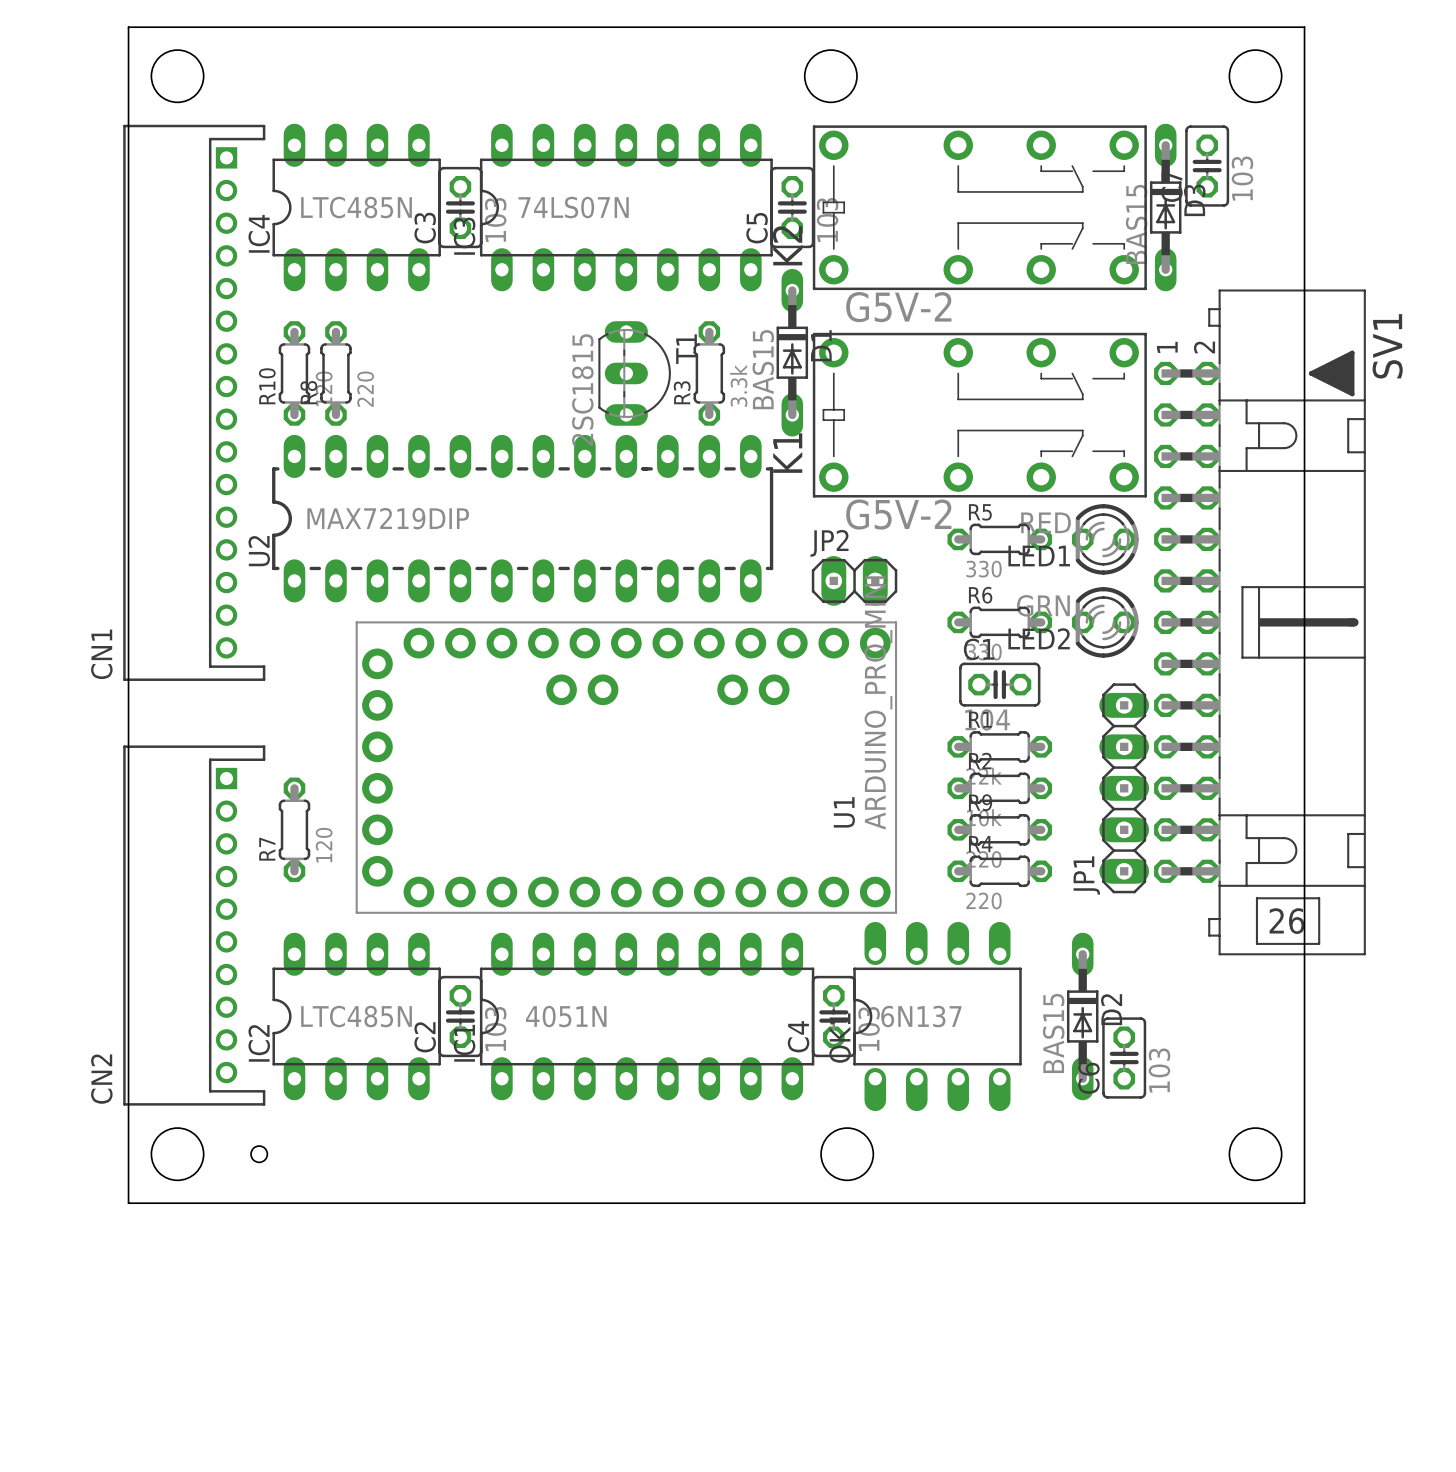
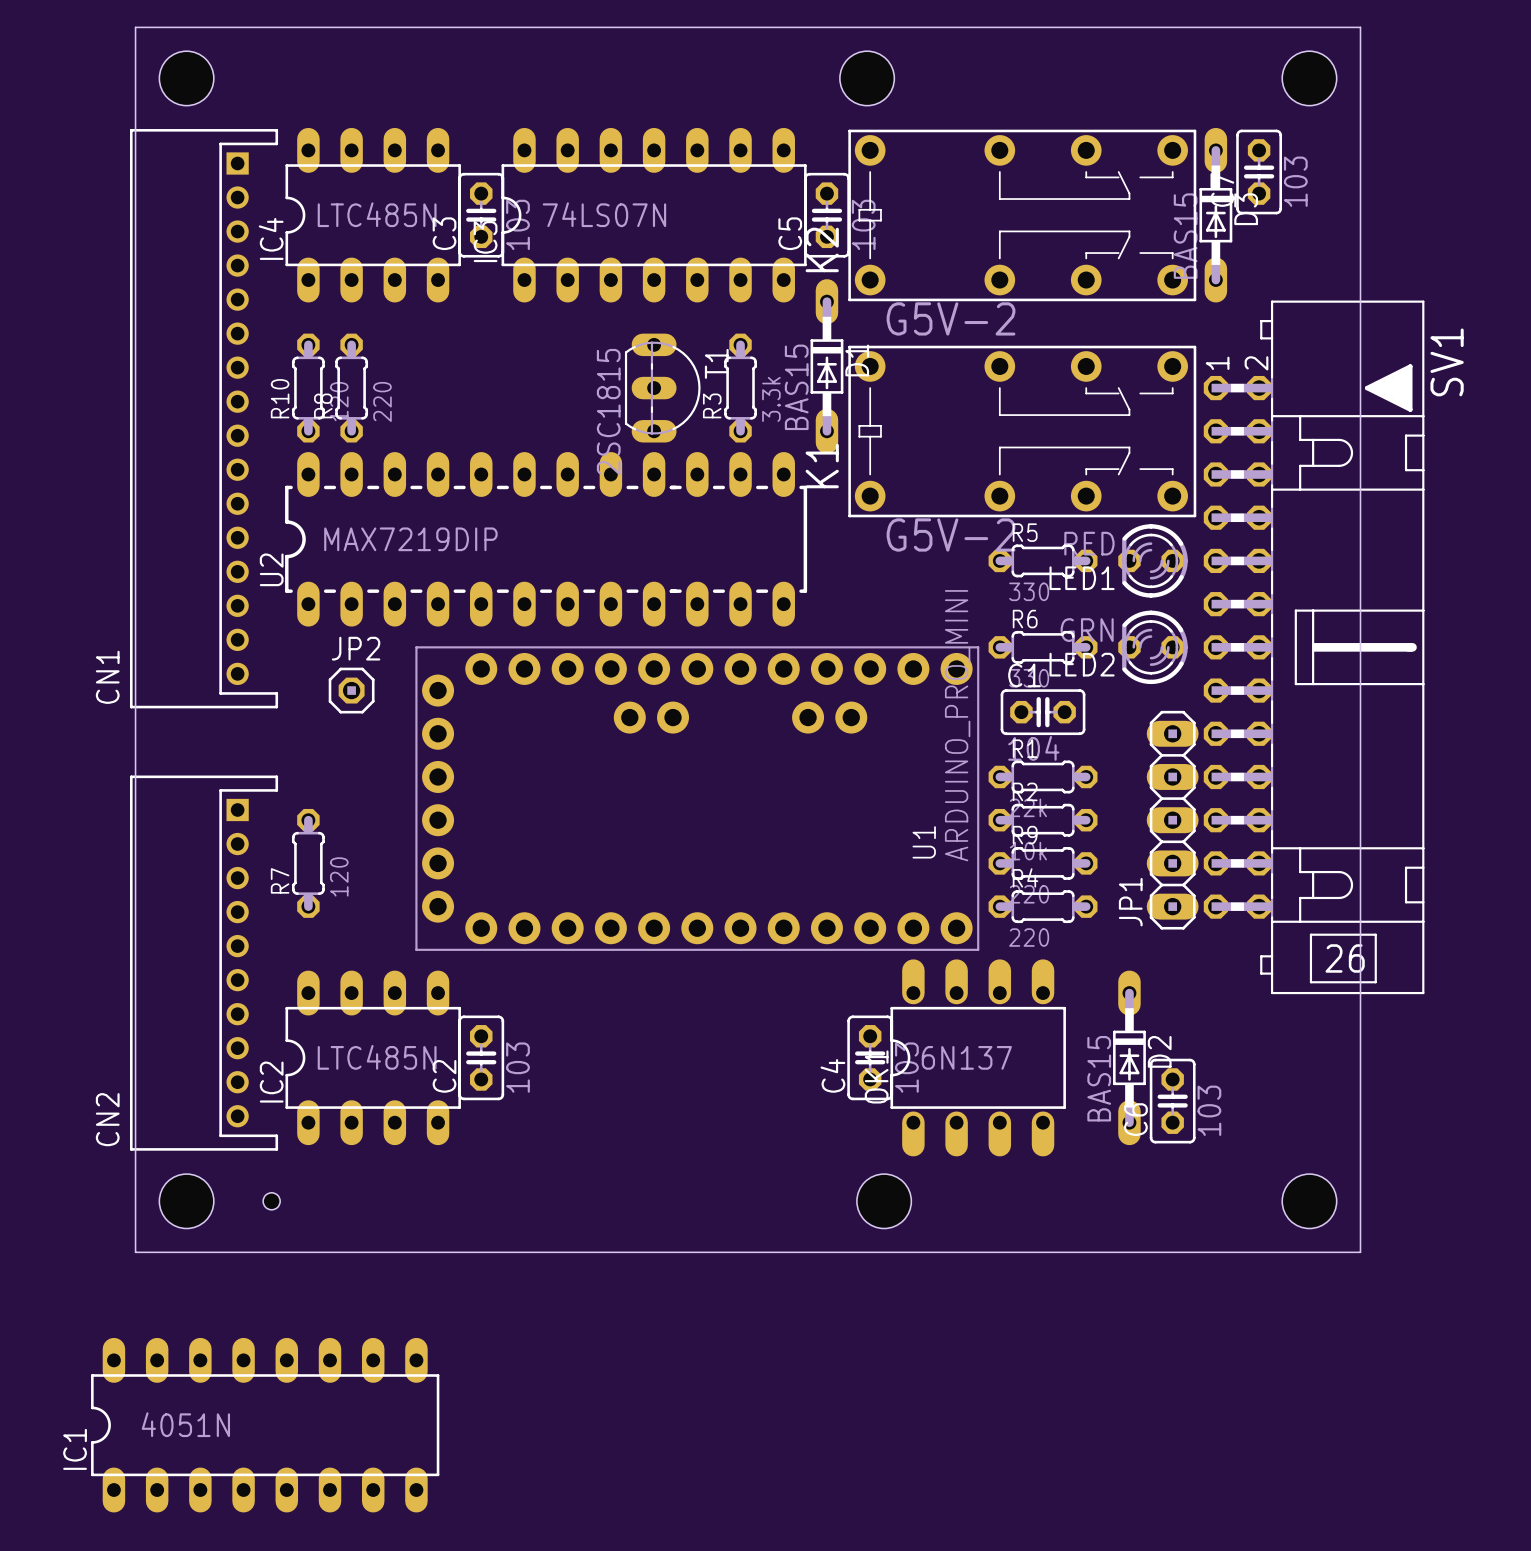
JP2 footprint: [811, 556, 898, 606] -> [328, 667, 375, 714]
U1 position: (626, 767) -> (697, 798)
IC1 position: (647, 1016) -> (265, 1425)

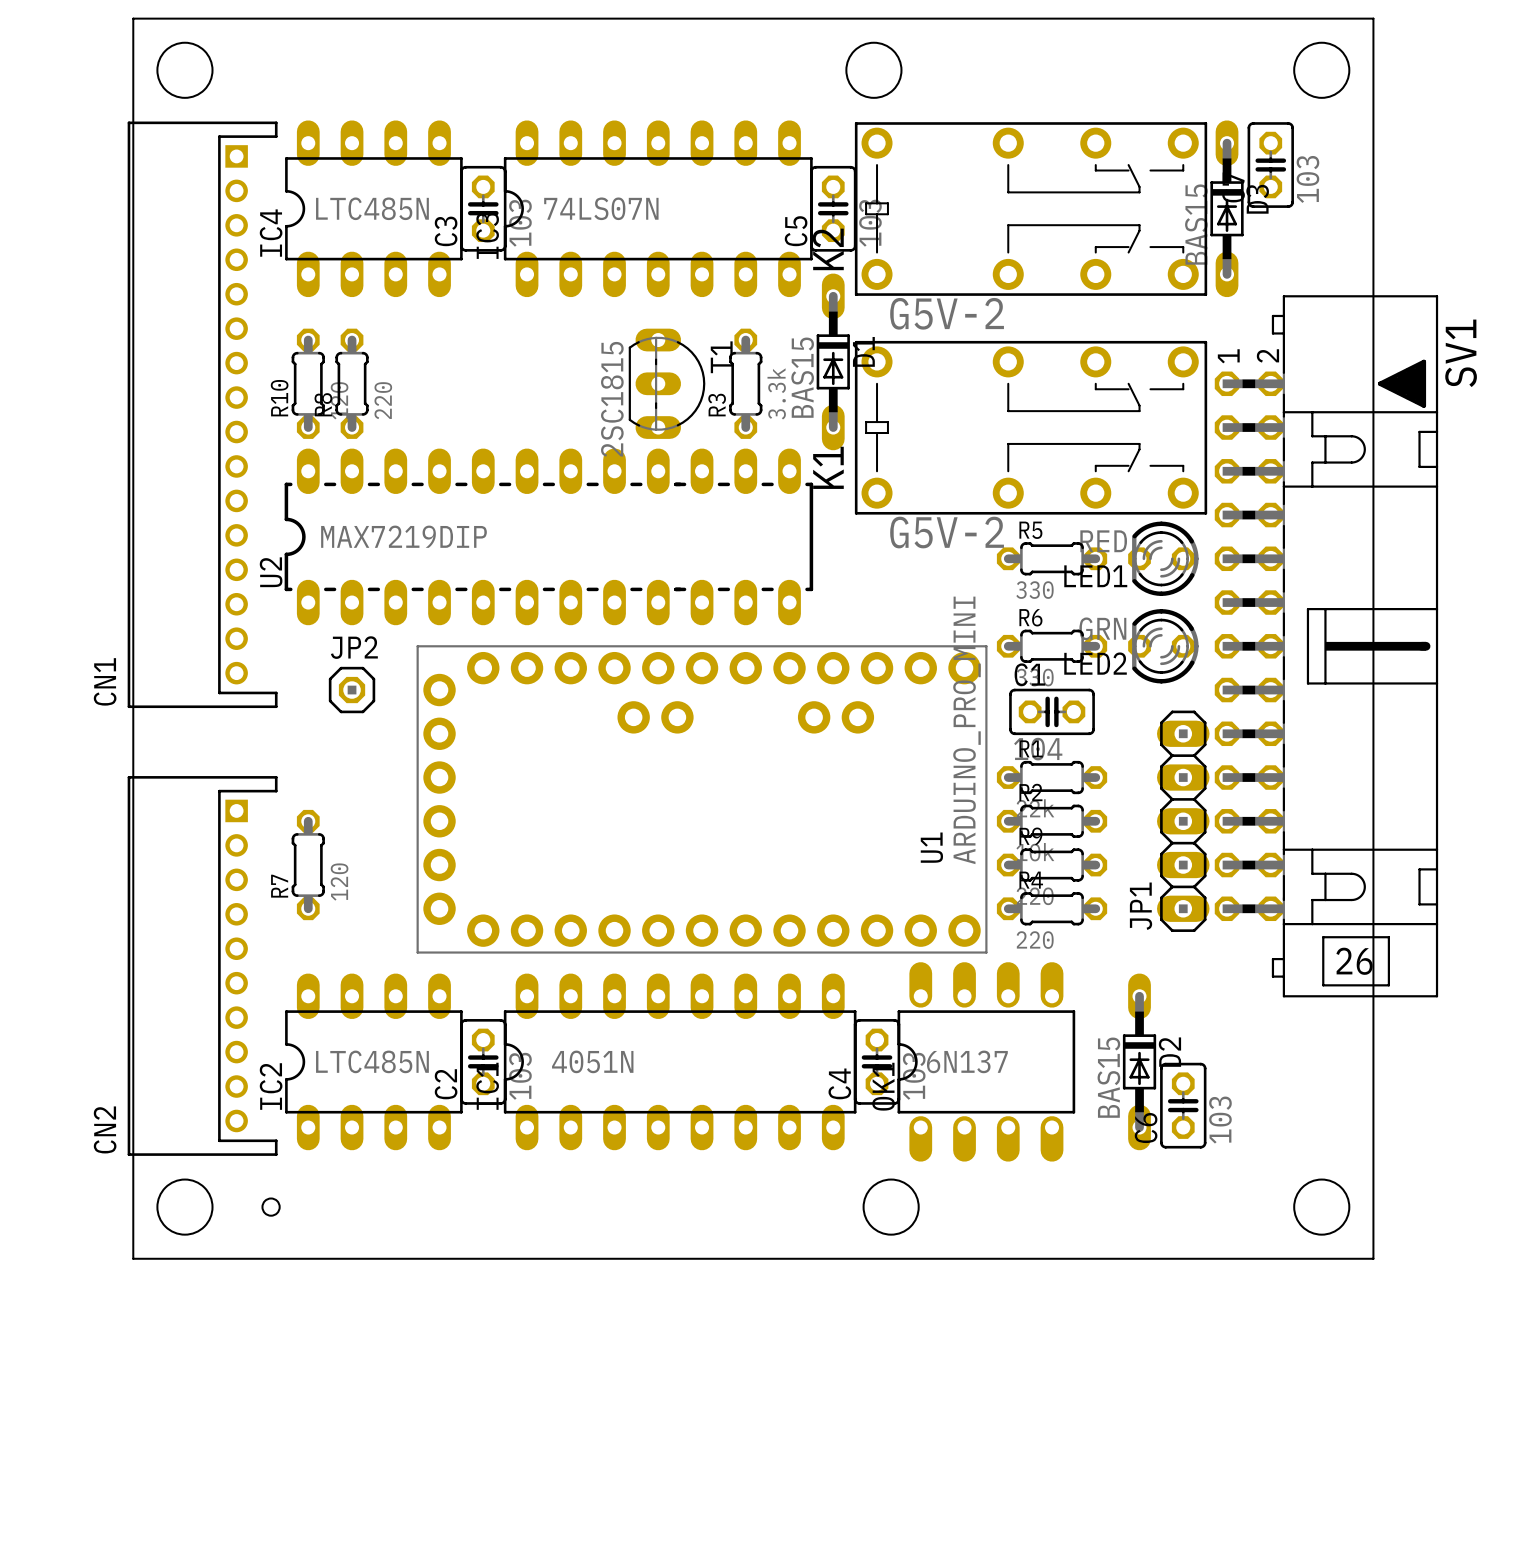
IC1 position: (265, 1425) -> (680, 1061)

